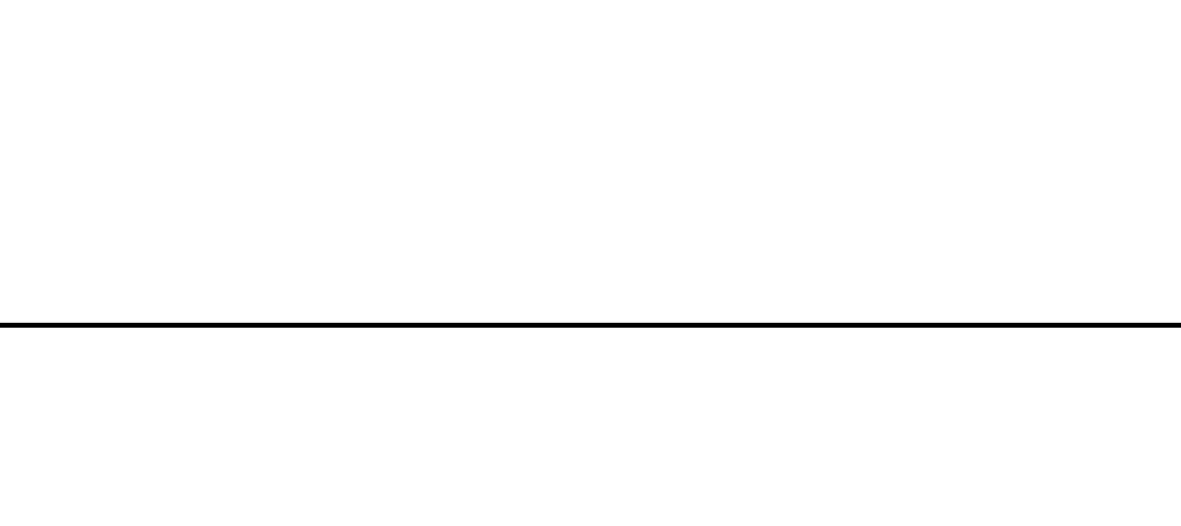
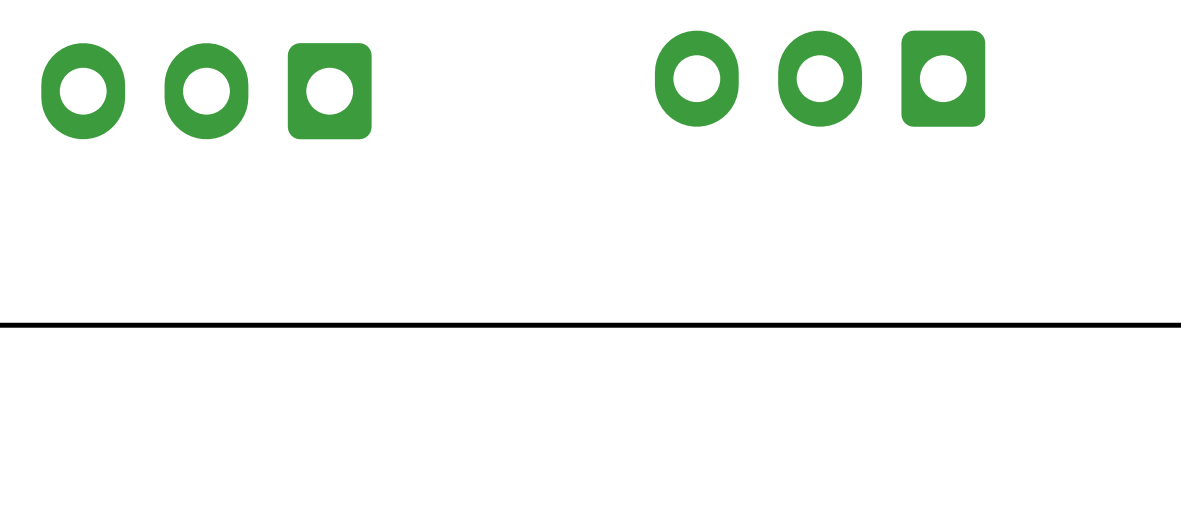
part: none -> (820, 78)
part: none -> (206, 91)

